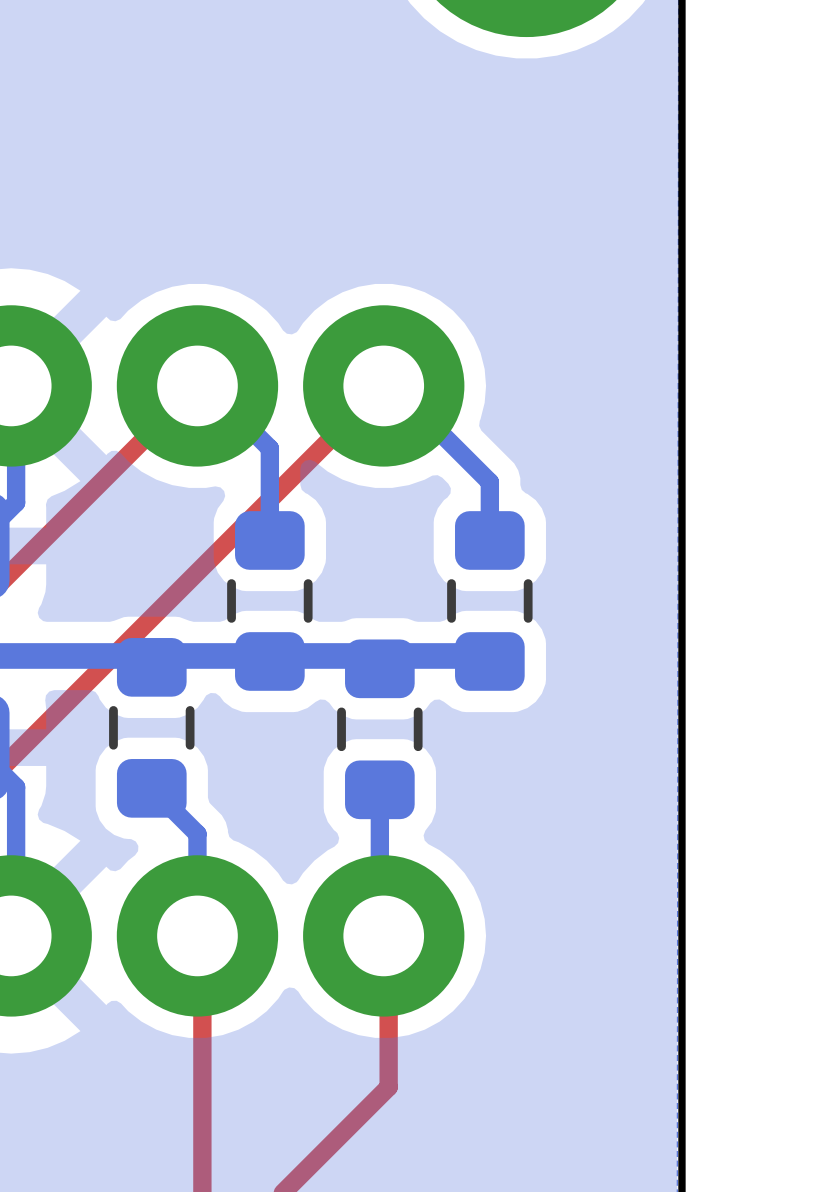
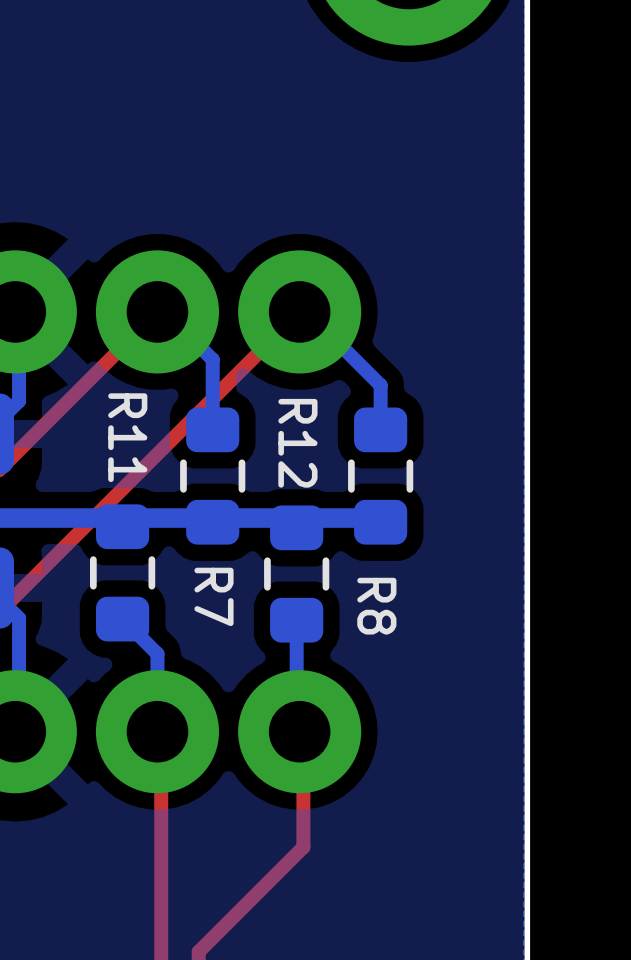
R11 name: none -> R11 (127, 437)
R12 name: none -> R12 (297, 443)
R7 name: none -> R7 (213, 596)
R8 name: none -> R8 (376, 606)

